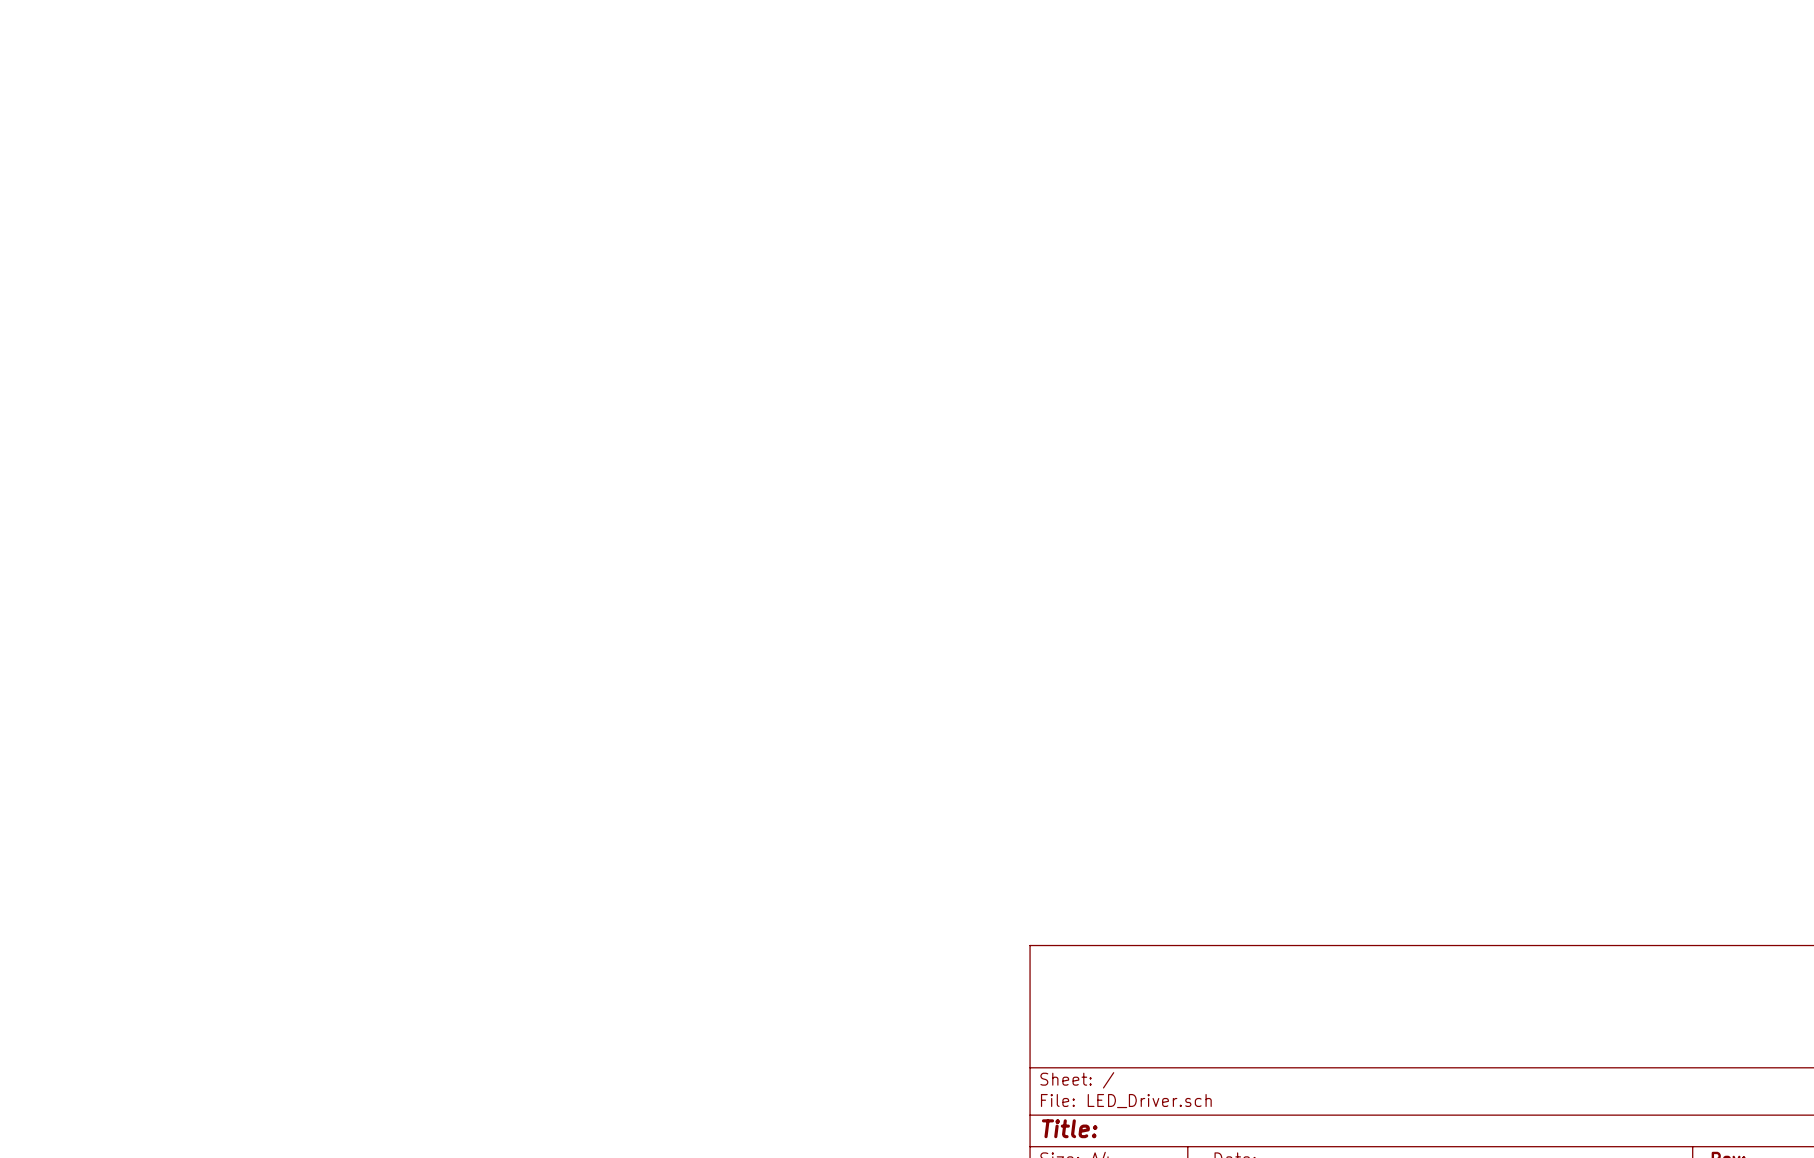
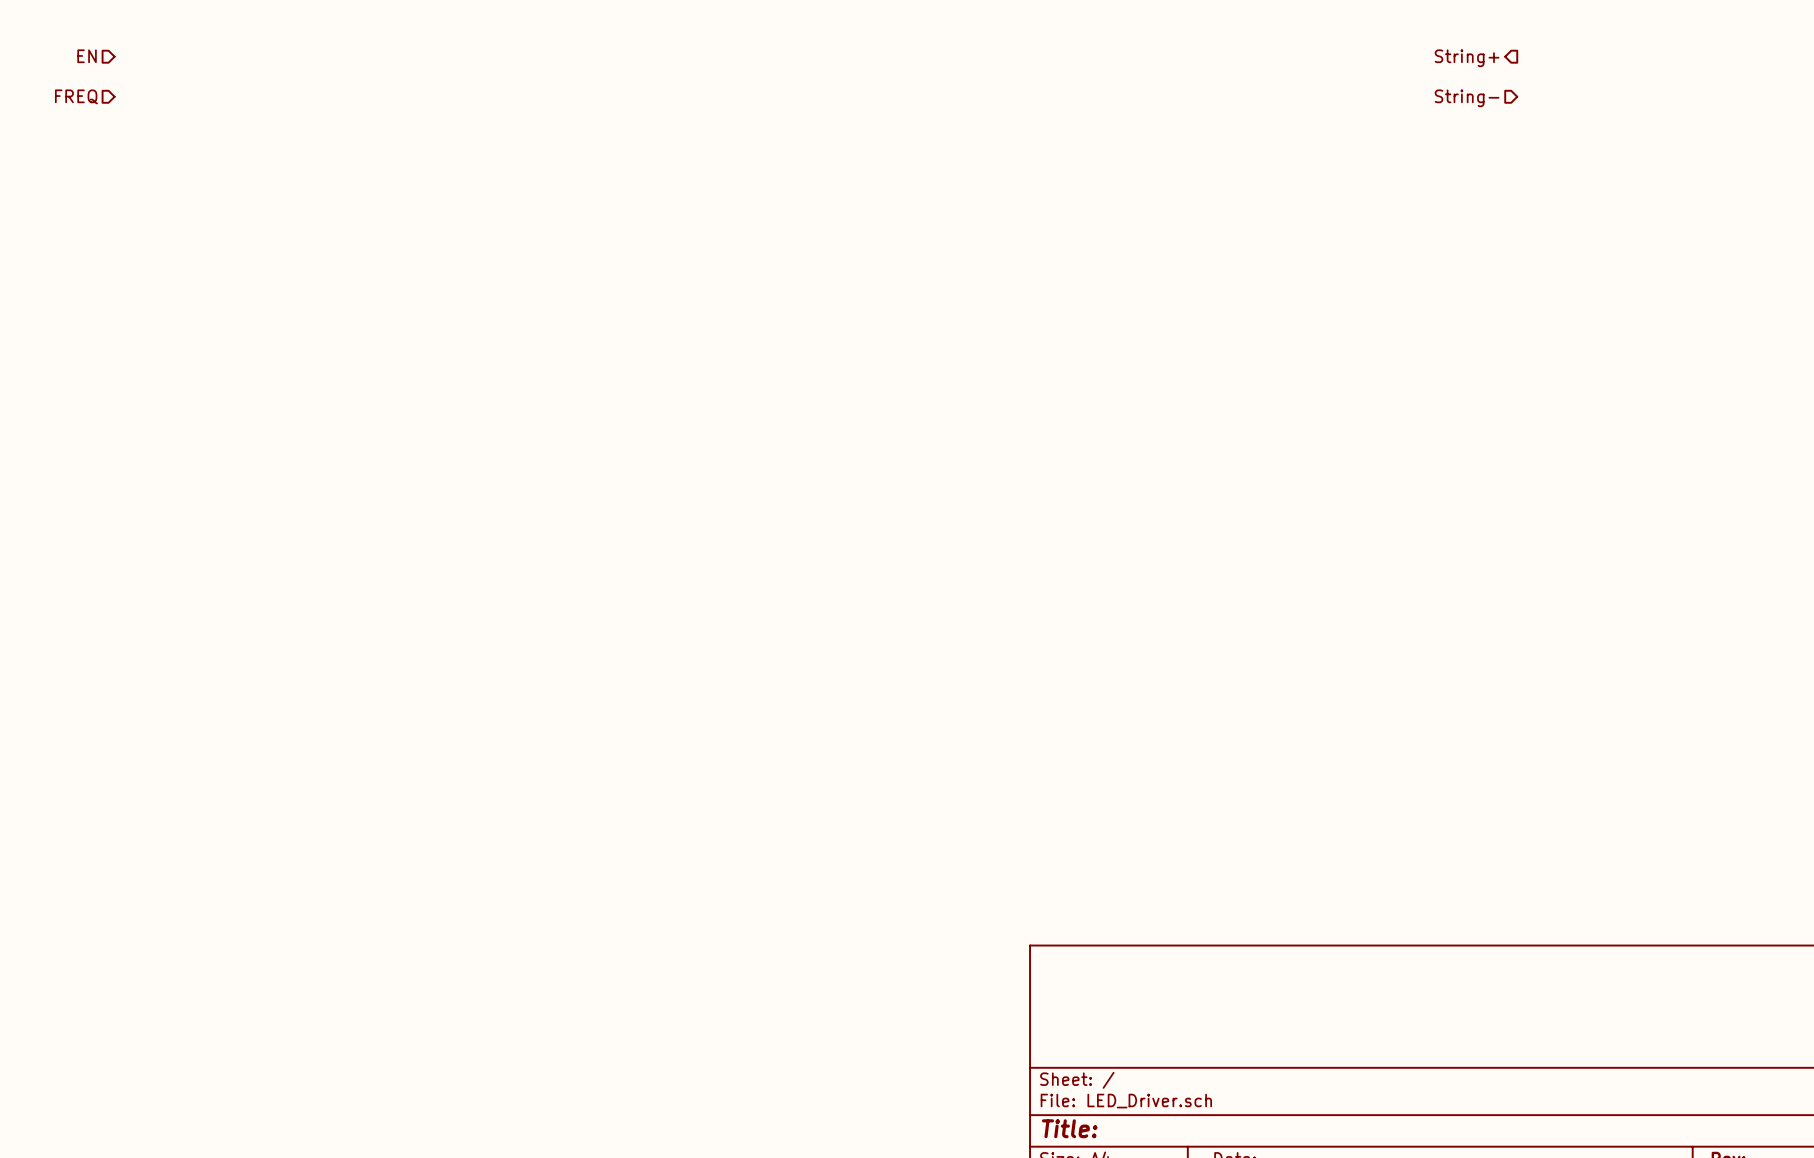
hierarchical label: none -> EN (87, 56)
hierarchical label: none -> String+ (1467, 58)
hierarchical label: none -> FREQ (76, 96)
hierarchical label: none -> String- (1467, 98)

